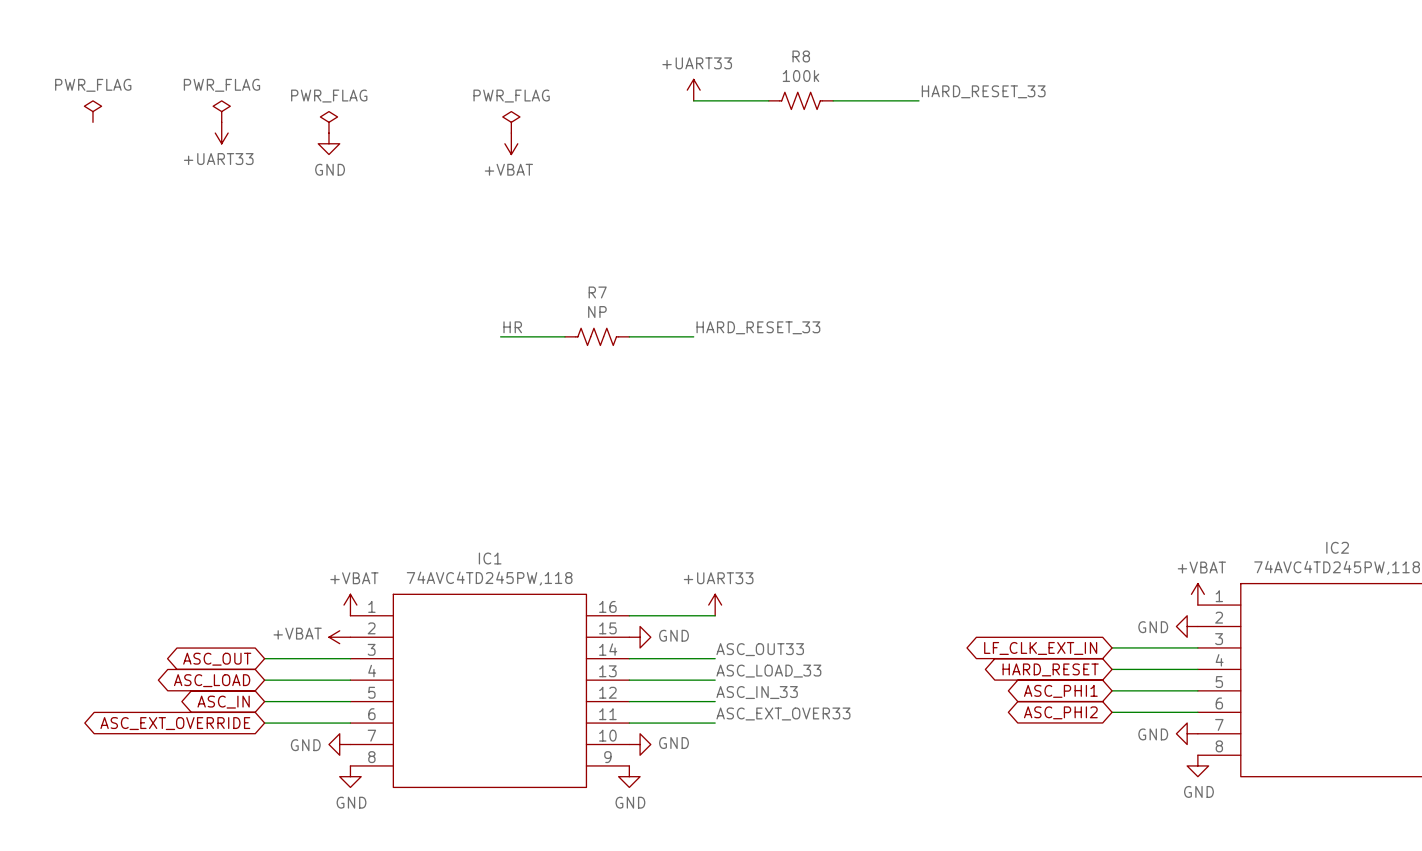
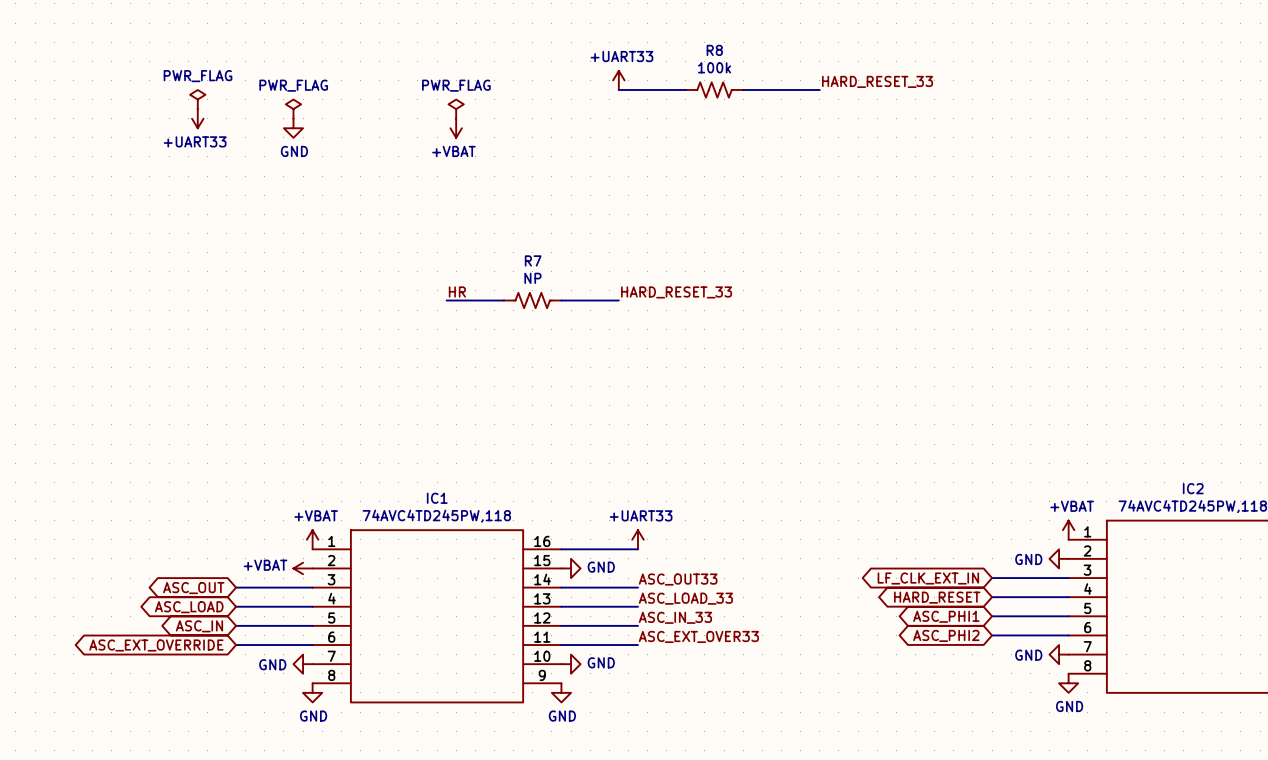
power symbol: PWR_FLAG (92, 111) -> none

